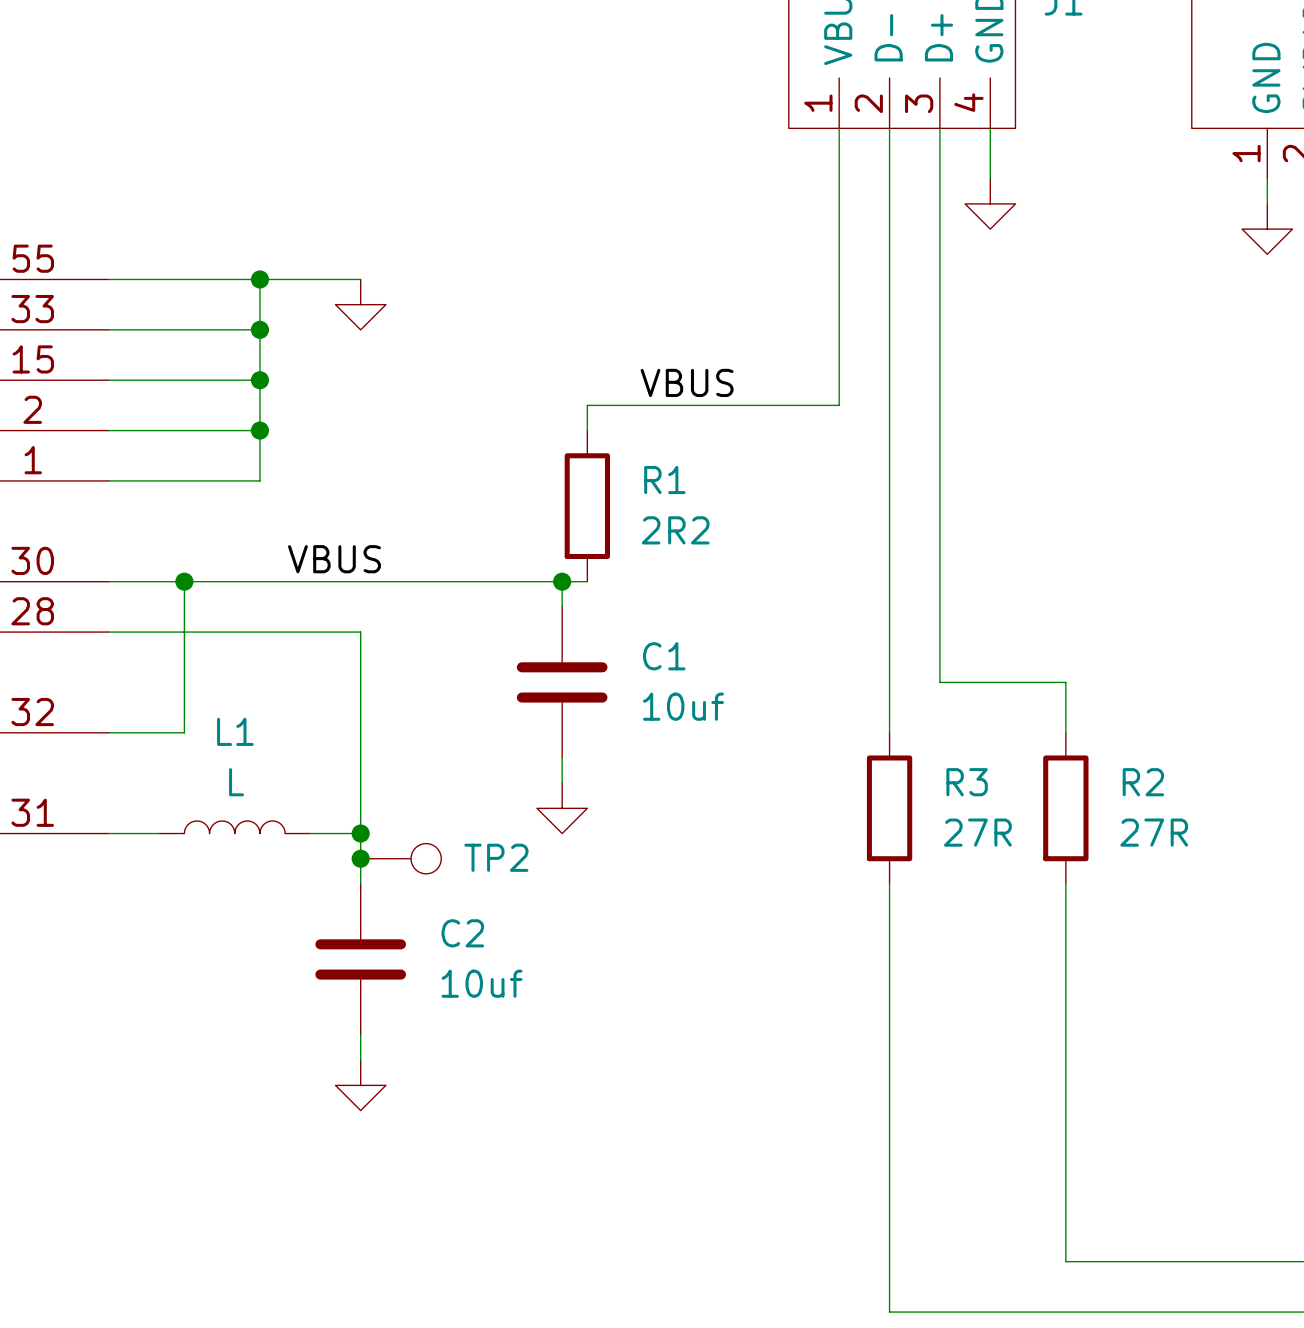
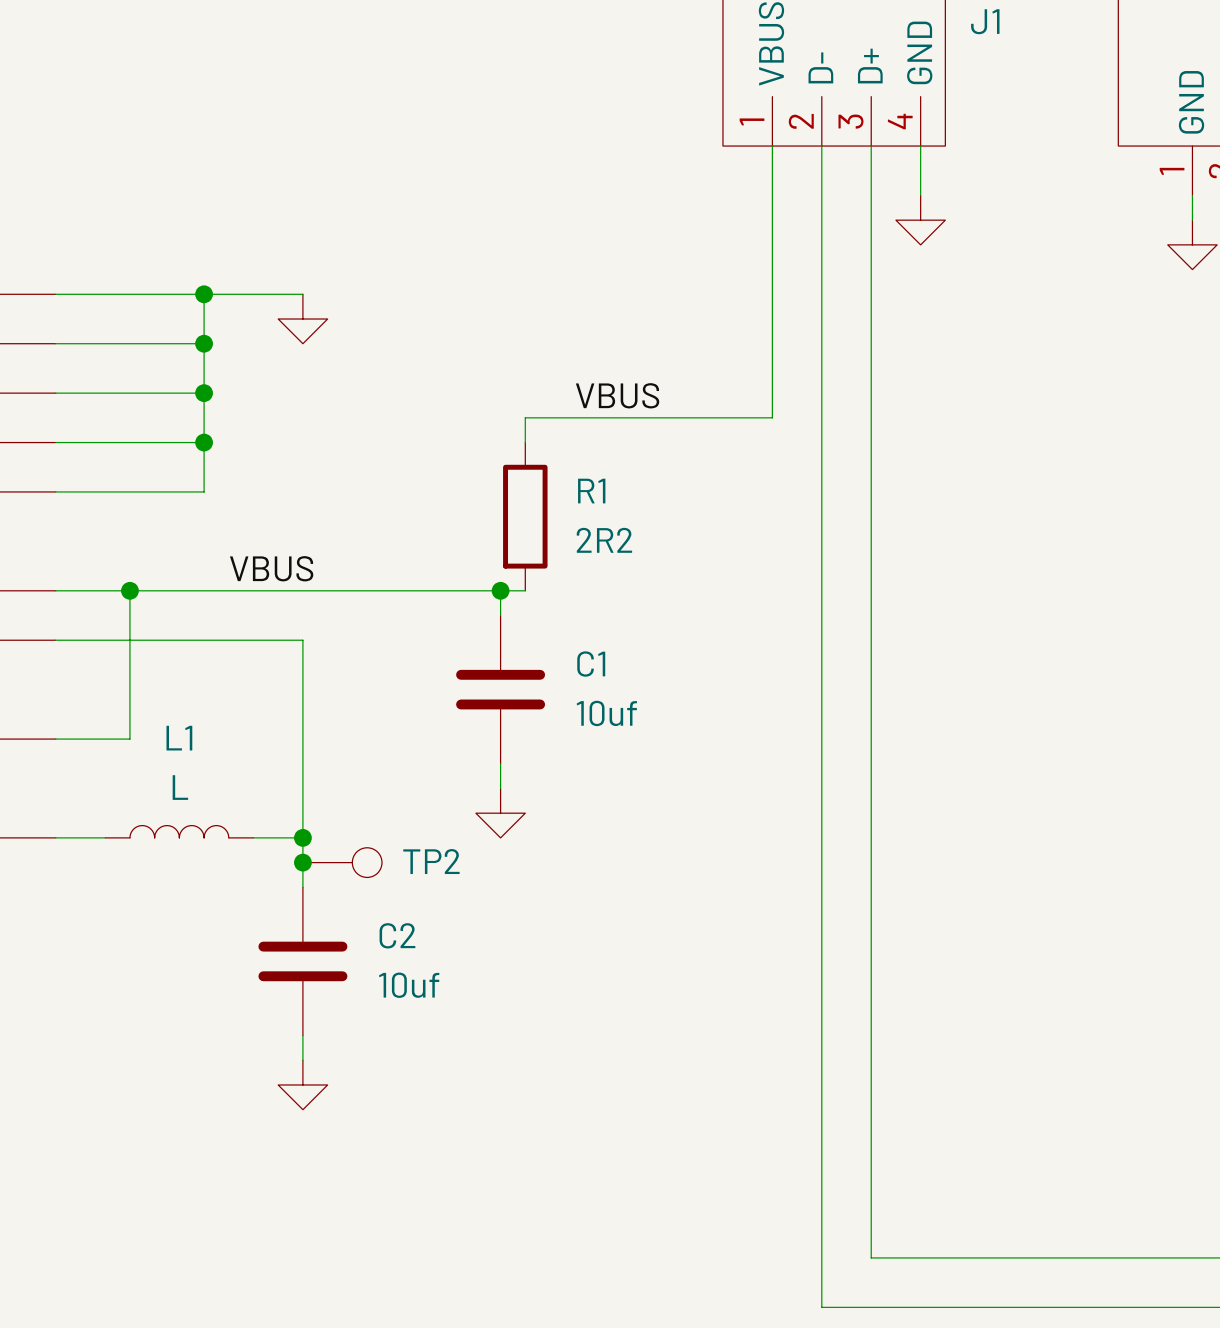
wire: (939, 682) (1065, 682) (1065, 732) -> none
wire: none -> (821, 739) (821, 887)
R3: 27R (889, 808) -> none
R2: 27R (1065, 808) -> none
wire: (1065, 883) (1065, 1261) -> (871, 689) (871, 1257) (994, 1257)

